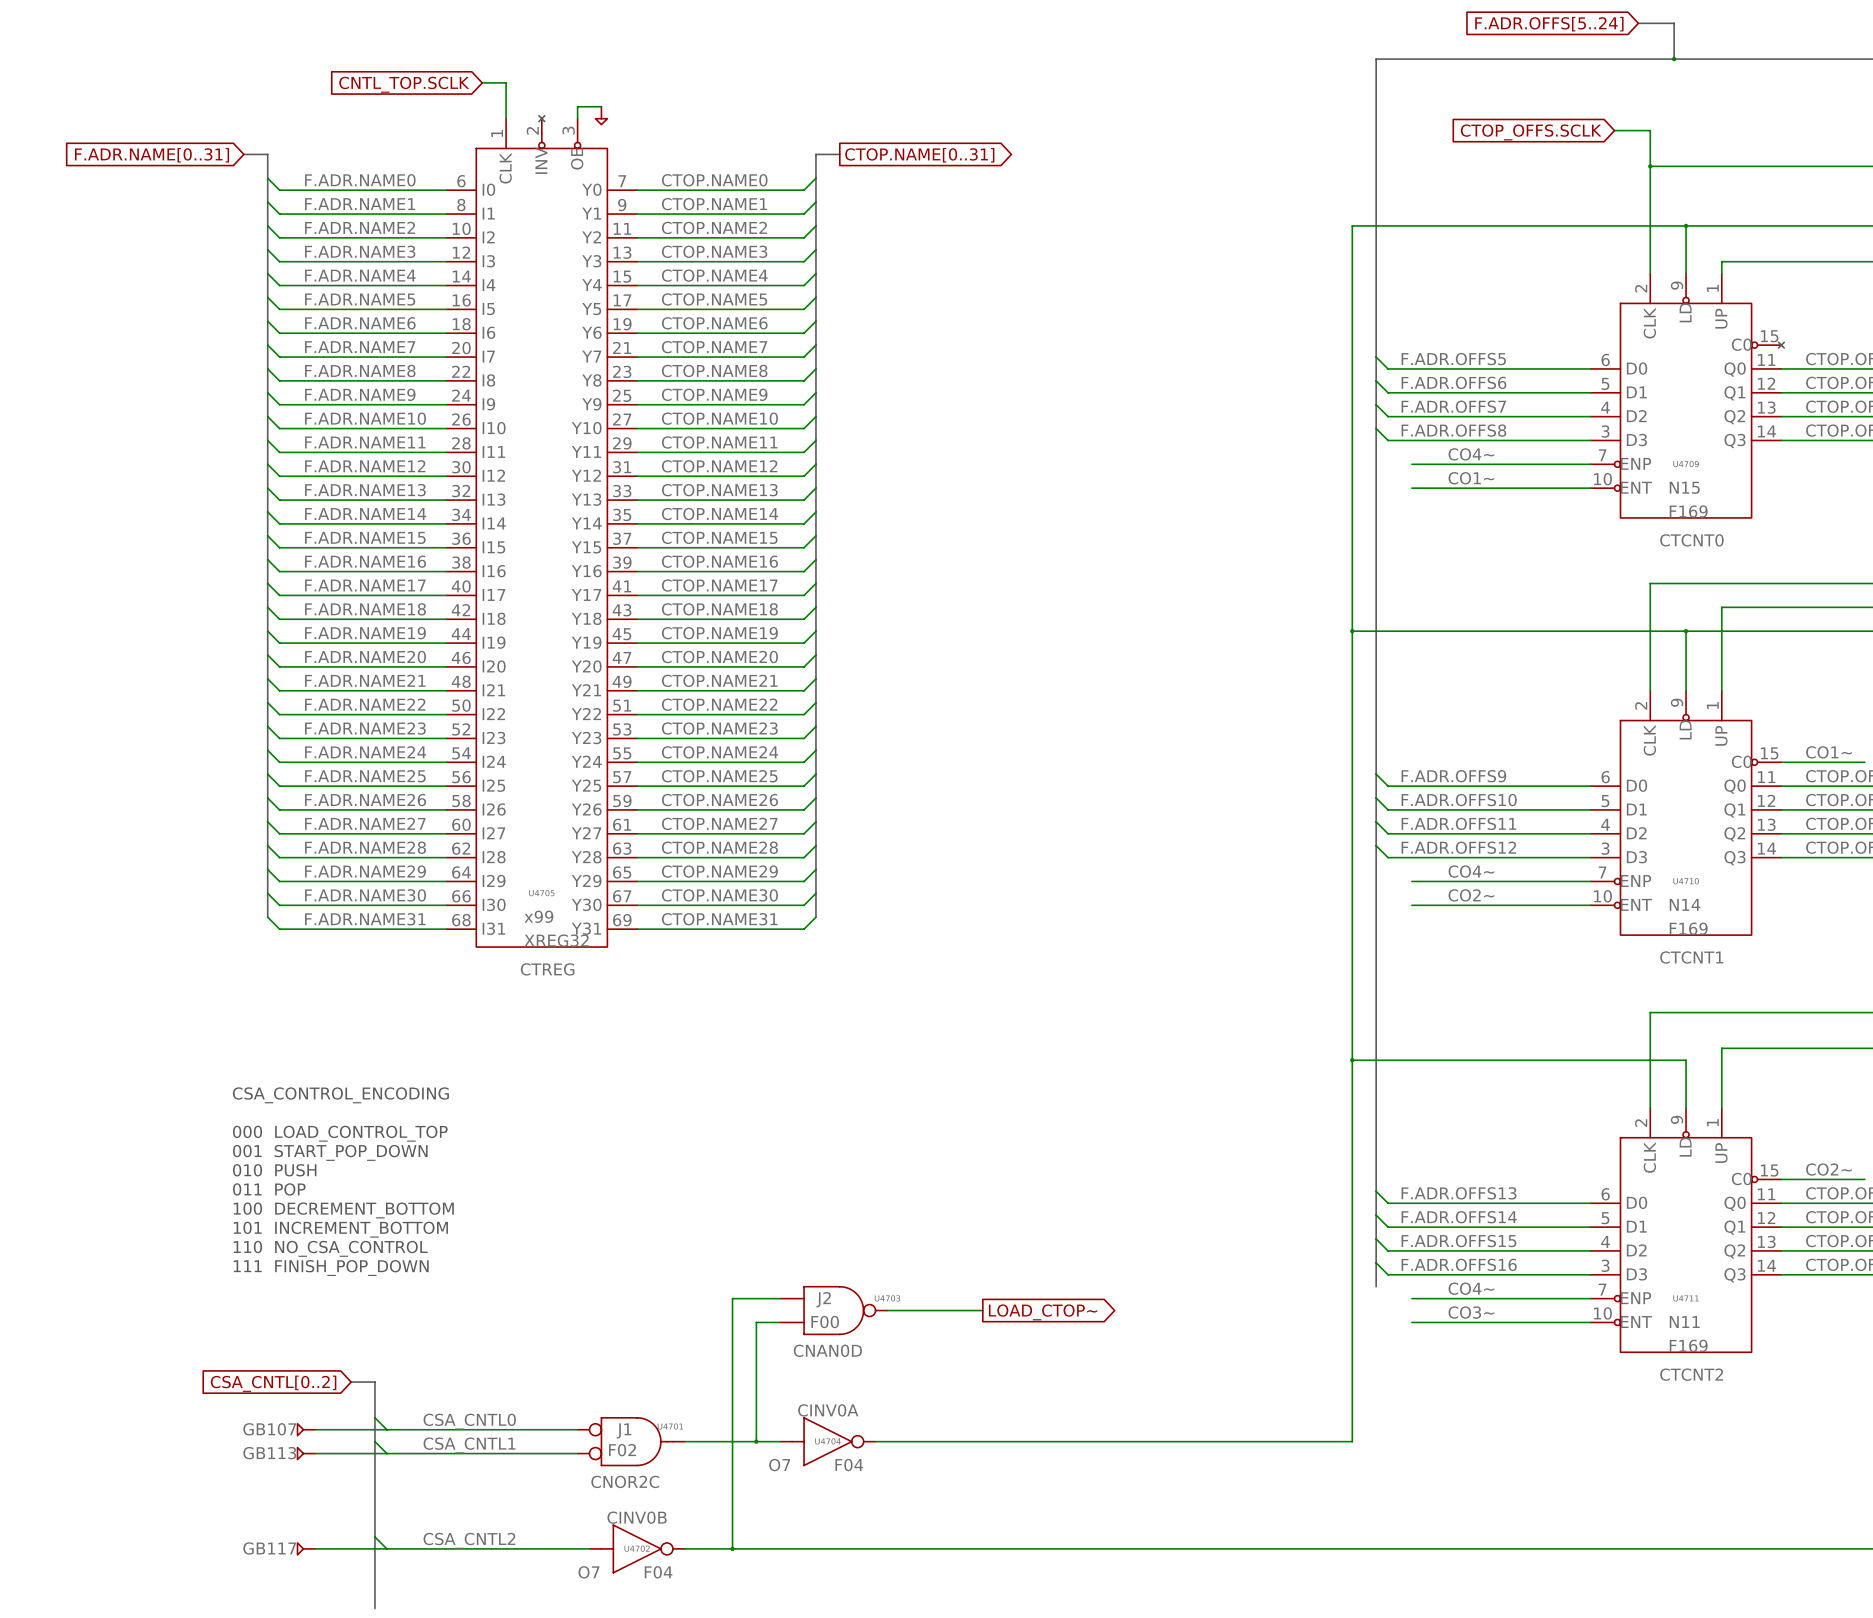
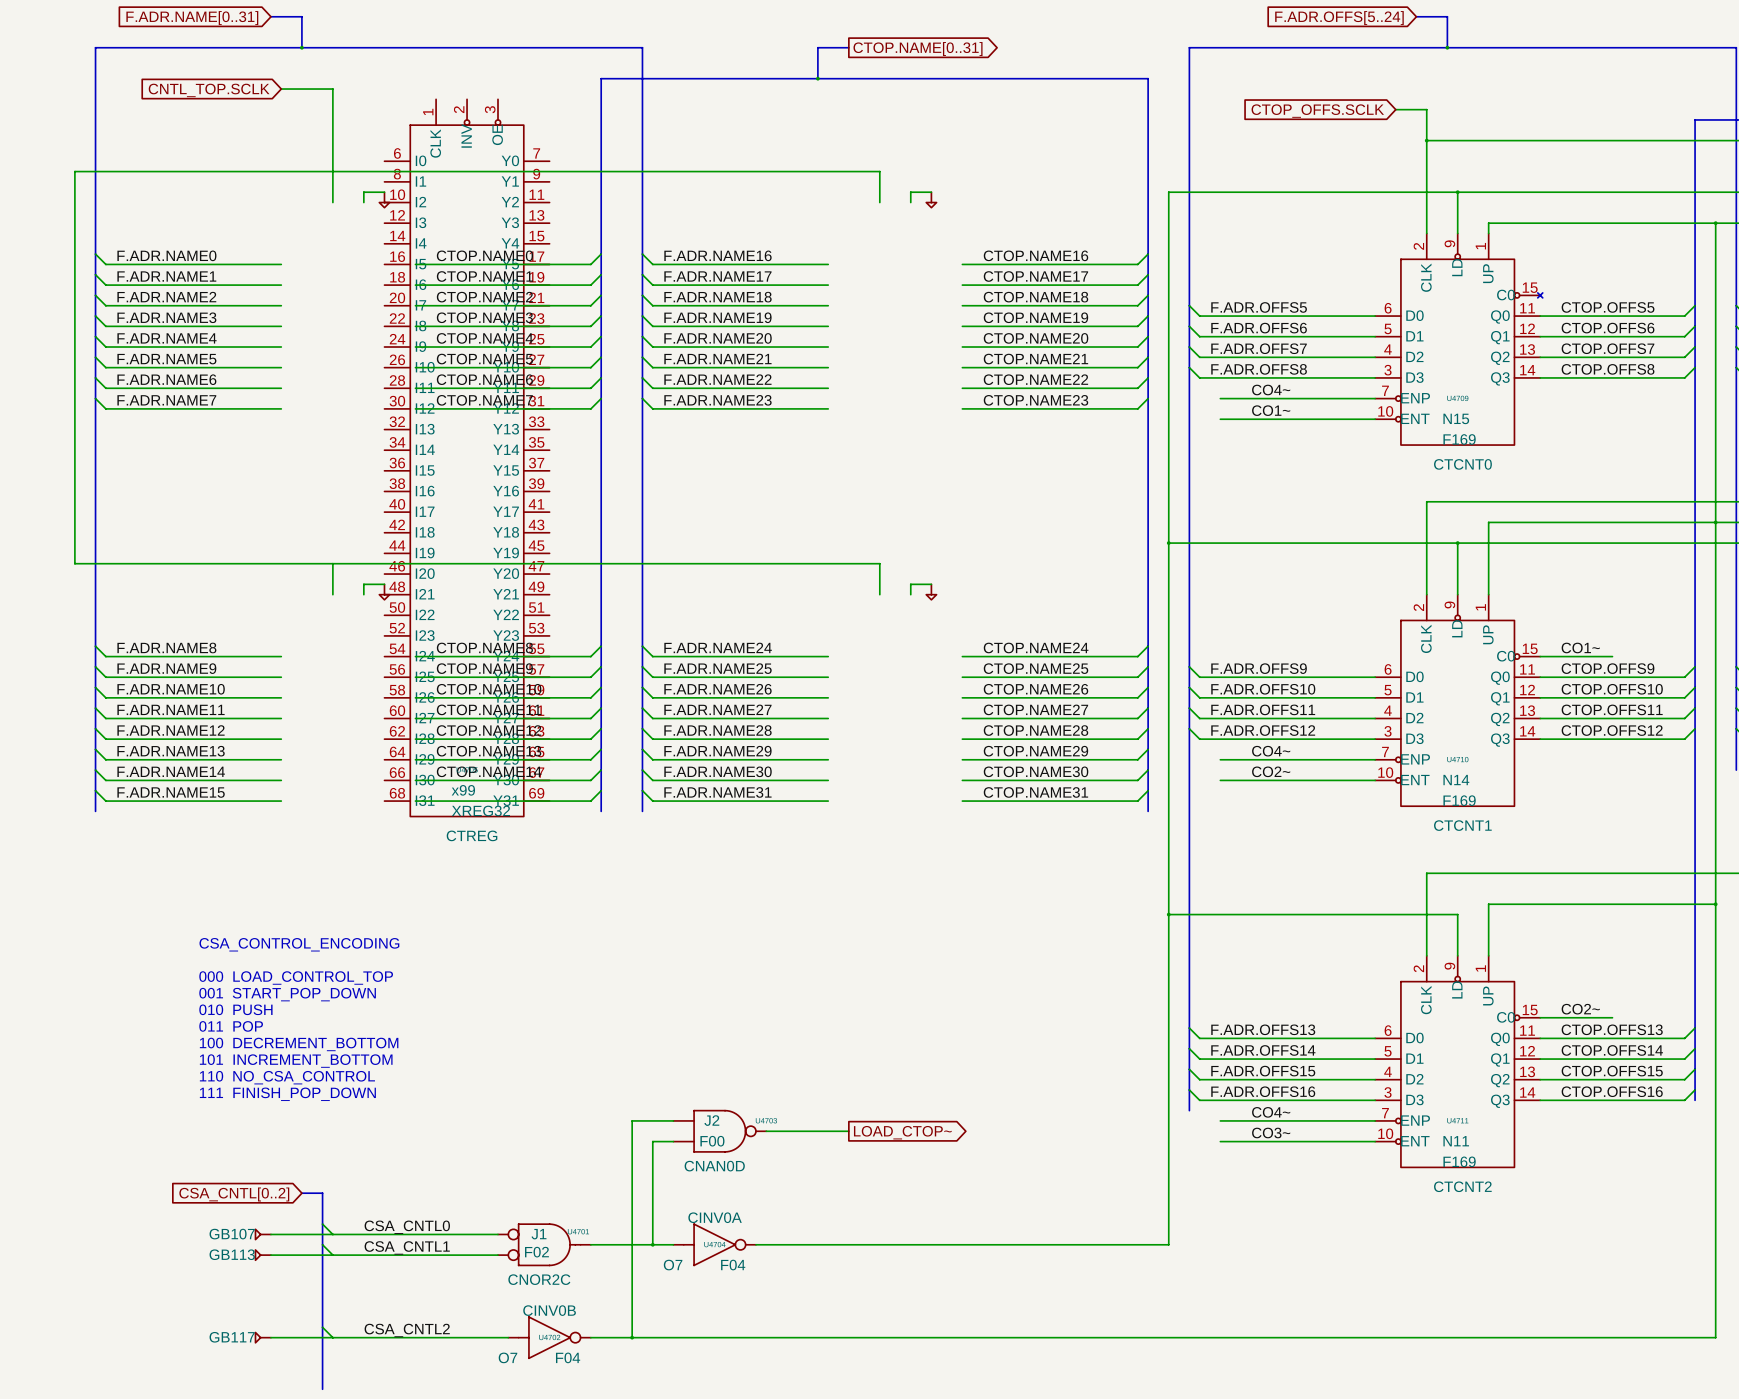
bus: none -> (270, 16) (301, 16) (301, 47)
global label: none -> F.ADR.NAME[0..31] (192, 18)
junction: none -> (301, 47)
bus: none -> (848, 47) (817, 47) (817, 78)
global label: none -> CTOP.NAME[0..31] (918, 49)
wire: (482, 82) (506, 82) (506, 118) -> none
global label: CNTL_TOP.SCLK (404, 84) -> none
junction: none -> (817, 78)
wire: none -> (281, 89) (332, 89) (332, 202)
wire: (601, 106) (577, 106) (577, 118) -> none
global label: none -> CNTL_TOP.SCLK (209, 90)
power symbol: (601, 115) -> none
no-connect mark: (541, 118) -> none
bus: (243, 154) (267, 154) (267, 917) -> none
bus: (839, 154) (815, 154) (815, 917) -> none
global label: F.ADR.NAME[0..31] (152, 155) -> none
global label: CTOP.NAME[0..31] (919, 155) -> none
wire: (267, 178) (279, 190) (446, 190) -> none
wire: (815, 178) (804, 190) (637, 190) -> none
label: F.ADR.NAME0 (360, 180) -> none
label: CTOP.NAME0 (714, 180) -> none
wire: (267, 202) (279, 214) (446, 214) -> none
wire: (815, 202) (804, 214) (637, 214) -> none
label: F.ADR.NAME1 (360, 204) -> none
label: CTOP.NAME1 (714, 204) -> none
wire: (267, 225) (279, 237) (446, 237) -> none
wire: none -> (384, 192) (363, 192) (363, 202)
wire: (815, 225) (804, 237) (637, 237) -> none
wire: none -> (931, 192) (910, 192) (910, 202)
label: F.ADR.NAME2 (360, 227) -> none
label: CTOP.NAME2 (714, 227) -> none
power symbol: none -> (384, 200)
power symbol: none -> (931, 200)
wire: none -> (879, 202) (879, 171) (74, 171) (74, 563) (879, 563) (879, 594)
wire: (267, 249) (279, 261) (446, 261) -> none
wire: (815, 249) (804, 261) (637, 261) -> none
label: F.ADR.NAME3 (360, 251) -> none
label: CTOP.NAME3 (714, 251) -> none
wire: (267, 273) (279, 285) (446, 285) -> none
wire: (815, 273) (804, 285) (637, 285) -> none
label: F.ADR.NAME4 (360, 275) -> none
label: CTOP.NAME4 (714, 275) -> none
wire: (267, 297) (279, 309) -> (95, 254) (105, 264) (240, 264)
wire: none -> (642, 254) (652, 264)
wire: (815, 297) (804, 309) -> (828, 264) (694, 264)
wire: none -> (1148, 254) (1137, 264) (962, 264)
label: none -> F.ADR.NAME0 (166, 255)
label: F.ADR.NAME5 (360, 299) -> none
label: none -> CTOP.NAME0 (484, 255)
label: CTOP.NAME5 (714, 299) -> none
label: none -> F.ADR.NAME16 (717, 255)
label: none -> CTOP.NAME16 (1035, 255)
wire: (327, 309) (446, 309) -> none
wire: none -> (415, 264) (549, 264)
wire: (684, 309) (756, 309) -> (590, 264) (601, 254)
wire: (267, 321) (279, 333) -> (95, 274) (105, 285) (240, 285)
wire: none -> (642, 274) (652, 285)
wire: (815, 321) (804, 333) -> (828, 285) (694, 285)
wire: none -> (1148, 274) (1137, 285) (962, 285)
label: none -> F.ADR.NAME1 (166, 276)
label: F.ADR.NAME6 (360, 323) -> none
label: none -> CTOP.NAME1 (484, 276)
label: CTOP.NAME6 (714, 323) -> none
label: none -> F.ADR.NAME17 (717, 276)
label: none -> CTOP.NAME17 (1035, 276)
wire: (327, 333) (446, 333) -> none
wire: none -> (415, 285) (549, 285)
wire: (684, 333) (756, 333) -> (590, 285) (601, 274)
wire: (267, 345) (279, 357) -> (95, 295) (105, 305) (240, 305)
wire: none -> (642, 295) (652, 305)
wire: (815, 345) (804, 357) -> (828, 305) (694, 305)
wire: none -> (1148, 295) (1137, 305) (962, 305)
label: none -> F.ADR.NAME2 (166, 297)
label: F.ADR.NAME7 (360, 347) -> none
label: none -> CTOP.NAME2 (484, 297)
label: CTOP.NAME7 (714, 347) -> none
label: none -> F.ADR.NAME18 (717, 297)
label: none -> CTOP.NAME18 (1035, 297)
wire: (327, 357) (446, 357) -> none
wire: none -> (415, 305) (549, 305)
wire: (684, 357) (756, 357) -> (590, 305) (601, 295)
wire: (267, 368) (279, 380) -> (95, 316) (105, 326) (240, 326)
wire: none -> (642, 316) (652, 326)
wire: (815, 368) (804, 380) -> (828, 326) (694, 326)
wire: none -> (1148, 316) (1137, 326) (962, 326)
label: none -> F.ADR.NAME3 (166, 317)
label: F.ADR.NAME8 (360, 370) -> none
label: none -> CTOP.NAME3 (484, 317)
label: CTOP.NAME8 (714, 370) -> none
label: none -> F.ADR.NAME19 (717, 317)
label: none -> CTOP.NAME19 (1035, 317)
wire: (327, 380) (446, 380) -> none
wire: none -> (415, 326) (549, 326)
wire: (684, 380) (756, 380) -> (590, 326) (601, 316)
wire: (267, 392) (279, 404) -> (95, 336) (105, 347) (240, 347)
wire: none -> (642, 336) (652, 347)
wire: (815, 392) (804, 404) -> (828, 347) (694, 347)
wire: none -> (1148, 336) (1137, 347) (962, 347)
label: none -> F.ADR.NAME4 (167, 338)
label: F.ADR.NAME9 (360, 394) -> none
label: none -> CTOP.NAME4 (485, 338)
label: CTOP.NAME9 (714, 394) -> none
label: none -> F.ADR.NAME20 (718, 338)
label: none -> CTOP.NAME20 (1036, 338)
wire: (327, 404) (446, 404) -> none
wire: none -> (415, 347) (549, 347)
wire: (684, 404) (756, 404) -> (590, 347) (601, 336)
wire: (267, 416) (279, 428) -> (95, 357) (105, 367) (240, 367)
wire: none -> (642, 357) (652, 367)
wire: (815, 416) (804, 428) -> (828, 367) (694, 367)
wire: none -> (1148, 357) (1137, 367) (962, 367)
label: none -> F.ADR.NAME5 (166, 359)
label: F.ADR.NAME10 (365, 418) -> none
label: none -> CTOP.NAME5 (484, 359)
label: CTOP.NAME10 (719, 418) -> none
label: none -> F.ADR.NAME21 (717, 358)
label: none -> CTOP.NAME21 (1035, 359)
wire: (327, 428) (446, 428) -> none
wire: none -> (415, 367) (549, 367)
wire: (684, 428) (756, 428) -> (590, 367) (601, 357)
wire: (267, 440) (279, 452) -> (95, 377) (105, 388) (240, 388)
wire: none -> (642, 377) (652, 388)
wire: (815, 440) (804, 452) -> (828, 388) (694, 388)
wire: none -> (1148, 377) (1137, 388) (962, 388)
label: none -> F.ADR.NAME6 (166, 379)
label: F.ADR.NAME11 (365, 442) -> none
label: none -> CTOP.NAME6 (484, 379)
label: CTOP.NAME11 (719, 442) -> none
label: none -> F.ADR.NAME22 (717, 379)
label: none -> CTOP.NAME22 (1035, 379)
wire: (327, 452) (446, 452) -> none
wire: none -> (415, 388) (549, 388)
wire: (684, 452) (756, 452) -> (590, 388) (601, 377)
wire: (267, 464) (279, 476) -> (95, 398) (105, 408) (240, 408)
wire: none -> (642, 398) (652, 408)
wire: (815, 464) (804, 476) -> (828, 408) (694, 408)
wire: none -> (1148, 398) (1137, 408) (962, 408)
label: none -> F.ADR.NAME7 (166, 400)
label: F.ADR.NAME12 (365, 466) -> none
label: none -> CTOP.NAME7 (484, 400)
label: CTOP.NAME12 (719, 466) -> none
label: none -> F.ADR.NAME23 (717, 400)
label: none -> CTOP.NAME23 (1035, 400)
wire: (327, 476) (446, 476) -> none
wire: none -> (415, 408) (549, 408)
wire: (684, 476) (756, 476) -> (590, 408) (601, 398)
wire: (267, 488) (279, 500) (446, 500) -> none
wire: (815, 488) (804, 500) (637, 500) -> none
label: F.ADR.NAME13 (365, 490) -> none
label: CTOP.NAME13 (719, 490) -> none
wire: (267, 511) (279, 523) (446, 523) -> none
wire: (815, 511) (804, 523) (637, 523) -> none
label: F.ADR.NAME14 (365, 513) -> none
label: CTOP.NAME14 (720, 514) -> none
wire: (267, 535) (279, 547) (446, 547) -> none
wire: (815, 535) (804, 547) (637, 547) -> none
label: F.ADR.NAME15 (365, 537) -> none
label: CTOP.NAME15 (719, 537) -> none
wire: (267, 559) (279, 571) (446, 571) -> none
wire: (815, 559) (804, 571) (637, 571) -> none
label: F.ADR.NAME16 (365, 561) -> none
label: CTOP.NAME16 (719, 561) -> none
wire: (267, 583) (279, 595) (446, 595) -> none
wire: (815, 583) (804, 595) (637, 595) -> none
label: F.ADR.NAME17 (365, 585) -> none
label: CTOP.NAME17 (719, 585) -> none
wire: (267, 607) (279, 619) (446, 619) -> none
wire: (815, 607) (804, 619) (637, 619) -> none
label: F.ADR.NAME18 (365, 609) -> none
label: CTOP.NAME18 (719, 609) -> none
wire: (267, 631) (279, 643) (446, 643) -> none
wire: (815, 631) (804, 643) (637, 643) -> none
label: F.ADR.NAME19 (365, 633) -> none
label: CTOP.NAME19 (719, 633) -> none
wire: (267, 655) (279, 666) (446, 666) -> none
wire: none -> (332, 563) (332, 594)
wire: (815, 655) (804, 666) (637, 666) -> none
label: F.ADR.NAME20 (365, 657) -> none
label: CTOP.NAME20 (719, 657) -> none
wire: (267, 678) (279, 690) (446, 690) -> none
wire: none -> (384, 584) (363, 584) (363, 594)
wire: (815, 678) (804, 690) (637, 690) -> none
wire: none -> (931, 584) (910, 584) (910, 594)
label: F.ADR.NAME21 (365, 680) -> none
label: CTOP.NAME21 (719, 680) -> none
power symbol: none -> (384, 592)
power symbol: none -> (931, 592)
wire: (267, 702) (279, 714) (446, 714) -> none
wire: (815, 702) (804, 714) (637, 714) -> none
label: F.ADR.NAME22 (365, 704) -> none
label: CTOP.NAME22 (719, 704) -> none
wire: (267, 726) (279, 738) (446, 738) -> none
wire: (815, 726) (804, 738) (637, 738) -> none
label: F.ADR.NAME23 (365, 728) -> none
label: CTOP.NAME23 (719, 728) -> none
wire: (267, 750) (279, 762) -> (95, 646) (105, 656) (240, 656)
wire: none -> (642, 646) (652, 656)
wire: (815, 750) (804, 762) -> (828, 656) (694, 656)
wire: none -> (1148, 646) (1137, 656) (962, 656)
label: none -> F.ADR.NAME8 (166, 647)
label: F.ADR.NAME24 (365, 752) -> none
label: none -> CTOP.NAME8 (484, 647)
label: CTOP.NAME24 (720, 752) -> F.ADR.NAME24 (718, 647)
label: none -> CTOP.NAME24 (1036, 647)
wire: (327, 762) (446, 762) -> none
wire: none -> (415, 656) (549, 656)
wire: (684, 762) (756, 762) -> (590, 656) (601, 646)
wire: (267, 774) (279, 786) -> (95, 666) (105, 677) (240, 677)
wire: none -> (642, 666) (652, 677)
wire: (815, 774) (804, 786) -> (828, 677) (694, 677)
wire: none -> (1148, 666) (1137, 677) (962, 677)
label: none -> F.ADR.NAME9 (166, 668)
label: F.ADR.NAME25 (365, 776) -> none
label: none -> CTOP.NAME9 (484, 668)
label: CTOP.NAME25 (719, 776) -> F.ADR.NAME25 (718, 668)
label: none -> CTOP.NAME25 (1036, 668)
wire: (327, 786) (446, 786) -> none
wire: none -> (415, 677) (549, 677)
wire: (684, 786) (756, 786) -> (590, 677) (601, 666)
wire: (267, 798) (279, 809) -> (95, 687) (105, 697) (240, 697)
wire: none -> (642, 687) (652, 697)
wire: (815, 798) (804, 809) -> (828, 697) (694, 697)
wire: none -> (1148, 687) (1137, 697) (962, 697)
label: none -> F.ADR.NAME10 (171, 689)
label: F.ADR.NAME26 (365, 800) -> none
label: none -> CTOP.NAME10 (489, 689)
label: CTOP.NAME26 (719, 800) -> F.ADR.NAME26 (717, 689)
label: none -> CTOP.NAME26 (1035, 689)
wire: (327, 809) (446, 809) -> none
wire: none -> (415, 697) (549, 697)
wire: (684, 809) (756, 809) -> (590, 697) (601, 687)
wire: (267, 821) (279, 833) -> (95, 708) (105, 718) (240, 718)
wire: none -> (642, 708) (652, 718)
wire: (815, 821) (804, 833) -> (828, 718) (694, 718)
wire: none -> (1148, 708) (1137, 718) (962, 718)
label: none -> F.ADR.NAME11 (171, 709)
label: F.ADR.NAME27 (365, 823) -> none
label: none -> CTOP.NAME11 (489, 709)
label: CTOP.NAME27 (719, 823) -> F.ADR.NAME27 (717, 709)
label: none -> CTOP.NAME27 (1035, 709)
wire: (327, 833) (446, 833) -> none
wire: none -> (415, 718) (549, 718)
wire: (684, 833) (756, 833) -> (590, 718) (601, 708)
wire: (267, 845) (279, 857) -> (95, 728) (105, 739) (240, 739)
wire: none -> (642, 728) (652, 739)
wire: (815, 845) (804, 857) -> (828, 739) (694, 739)
wire: none -> (1148, 728) (1137, 739) (962, 739)
label: none -> F.ADR.NAME12 (171, 730)
label: F.ADR.NAME28 (365, 847) -> none
label: none -> CTOP.NAME12 (489, 730)
label: CTOP.NAME28 (719, 847) -> F.ADR.NAME28 (717, 730)
label: none -> CTOP.NAME28 (1035, 730)
wire: (327, 857) (446, 857) -> none
wire: none -> (415, 739) (549, 739)
wire: (684, 857) (756, 857) -> (590, 739) (601, 728)
wire: (267, 869) (279, 881) -> (95, 749) (105, 759) (240, 759)
wire: none -> (642, 749) (652, 759)
wire: (815, 869) (804, 881) -> (828, 759) (694, 759)
wire: none -> (1148, 749) (1137, 759) (962, 759)
label: none -> F.ADR.NAME13 (171, 751)
label: F.ADR.NAME29 (365, 871) -> none
label: none -> CTOP.NAME13 (489, 751)
label: CTOP.NAME29 (719, 871) -> F.ADR.NAME29 (717, 751)
label: none -> CTOP.NAME29 (1035, 751)
wire: (327, 881) (446, 881) -> none
wire: none -> (415, 759) (549, 759)
wire: (684, 881) (756, 881) -> (590, 759) (601, 749)
wire: (267, 893) (279, 905) -> (95, 770) (105, 780) (240, 780)
wire: none -> (642, 770) (652, 780)
wire: (815, 893) (804, 905) -> (828, 780) (694, 780)
wire: none -> (1148, 770) (1137, 780) (962, 780)
label: none -> F.ADR.NAME14 (171, 771)
label: F.ADR.NAME30 (365, 895) -> none
label: none -> CTOP.NAME14 (489, 771)
label: CTOP.NAME30 (719, 895) -> F.ADR.NAME30 (718, 771)
label: none -> CTOP.NAME30 (1036, 771)
wire: (327, 905) (446, 905) -> none
wire: none -> (415, 780) (549, 780)
wire: (684, 905) (756, 905) -> (590, 780) (601, 770)
wire: (267, 917) (279, 929) -> (95, 790) (105, 801) (240, 801)
wire: none -> (642, 790) (652, 801)
wire: (815, 917) (804, 929) -> (828, 801) (694, 801)
wire: none -> (1148, 790) (1137, 801) (962, 801)
label: none -> F.ADR.NAME15 (171, 792)
label: F.ADR.NAME31 (365, 919) -> none
label: CTOP.NAME31 (719, 919) -> F.ADR.NAME31 (717, 792)
label: none -> CTOP.NAME31 (1035, 792)
wire: (327, 929) (446, 929) -> none
wire: none -> (415, 801) (549, 801)
wire: (684, 929) (756, 929) -> (590, 801) (601, 790)
bus: none -> (95, 811) (95, 47) (642, 47) (642, 811)
bus: none -> (601, 811) (601, 78) (1148, 78) (1148, 811)

